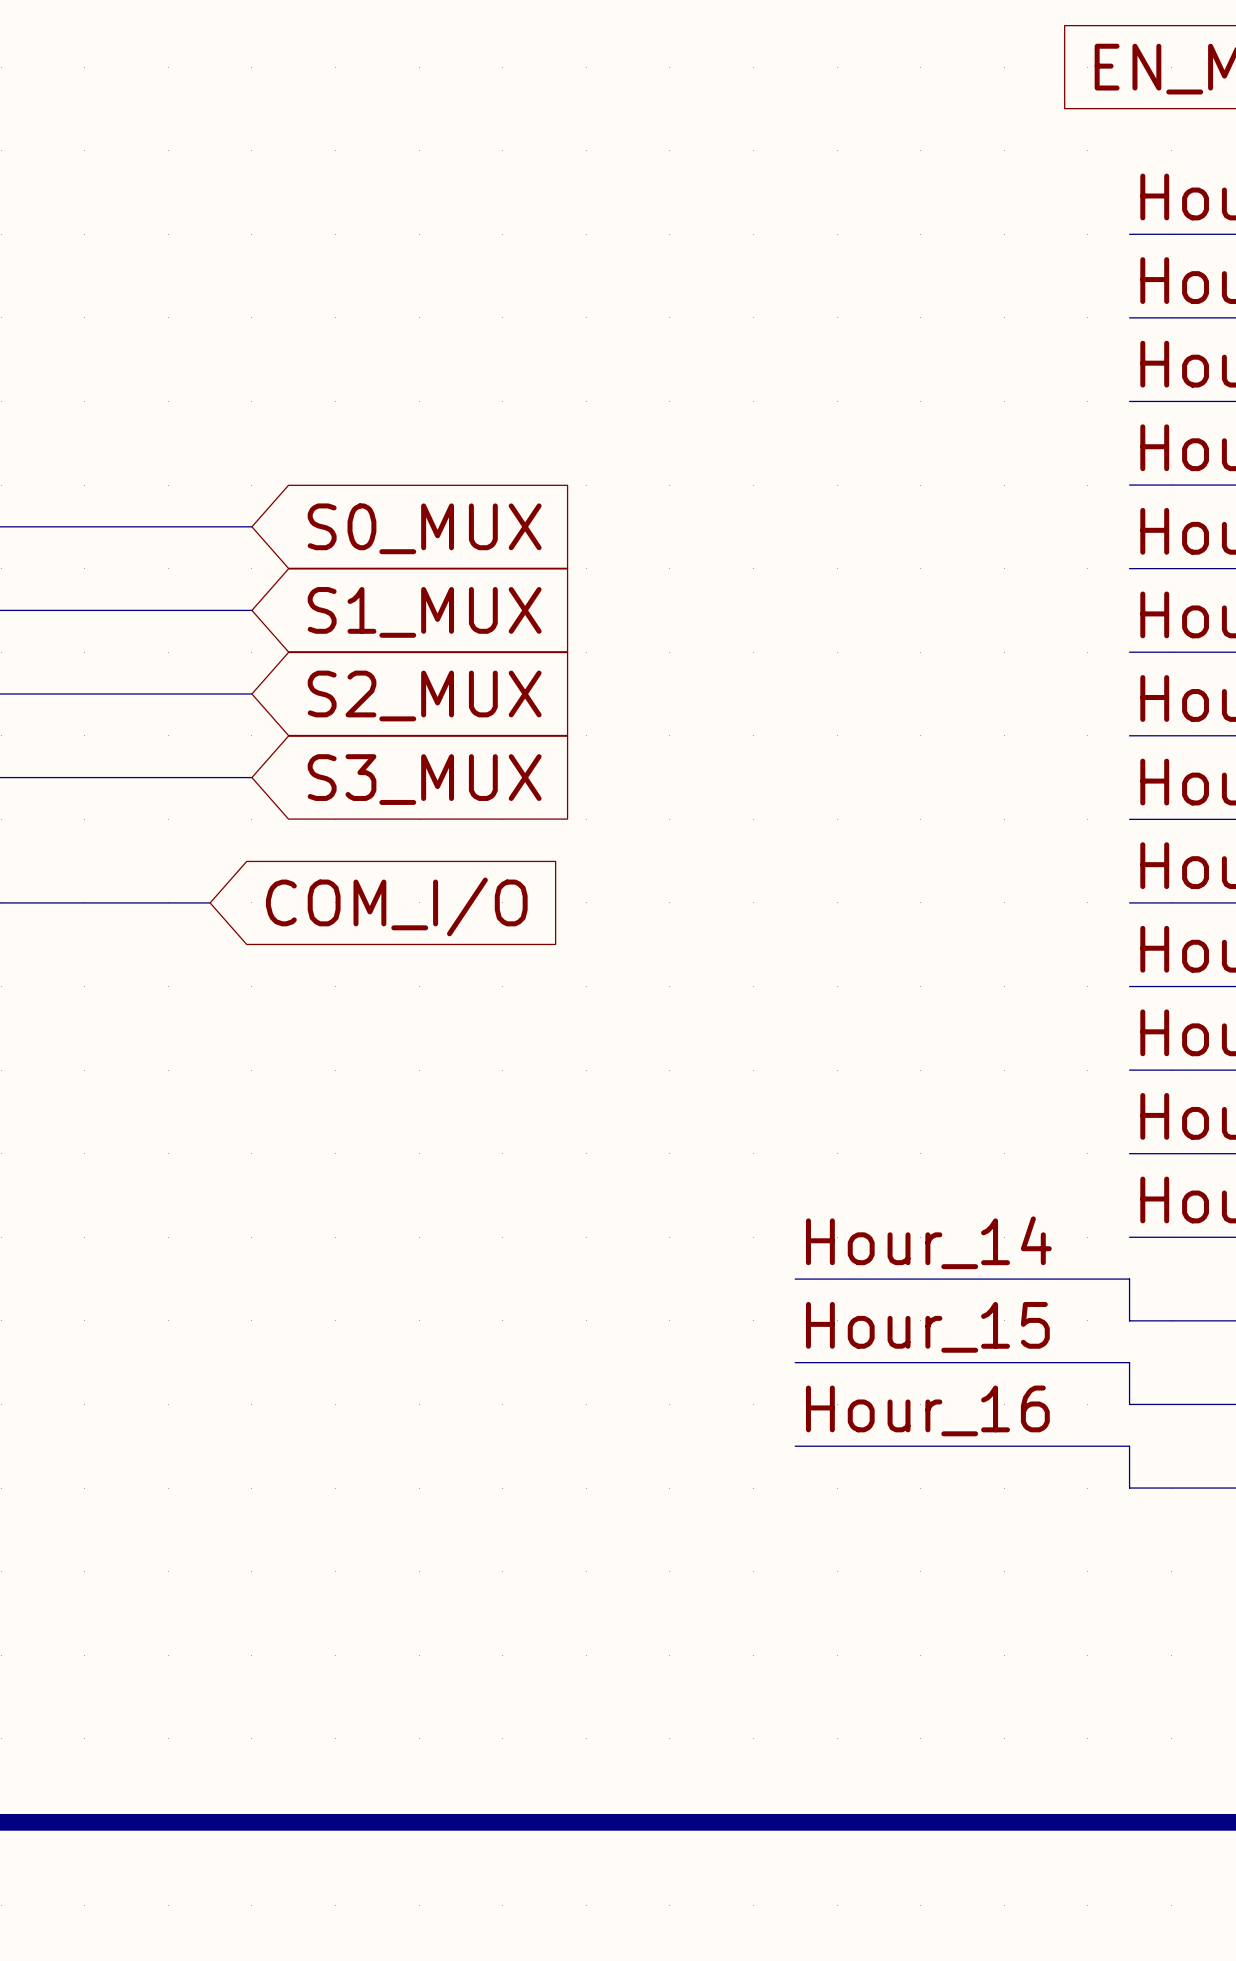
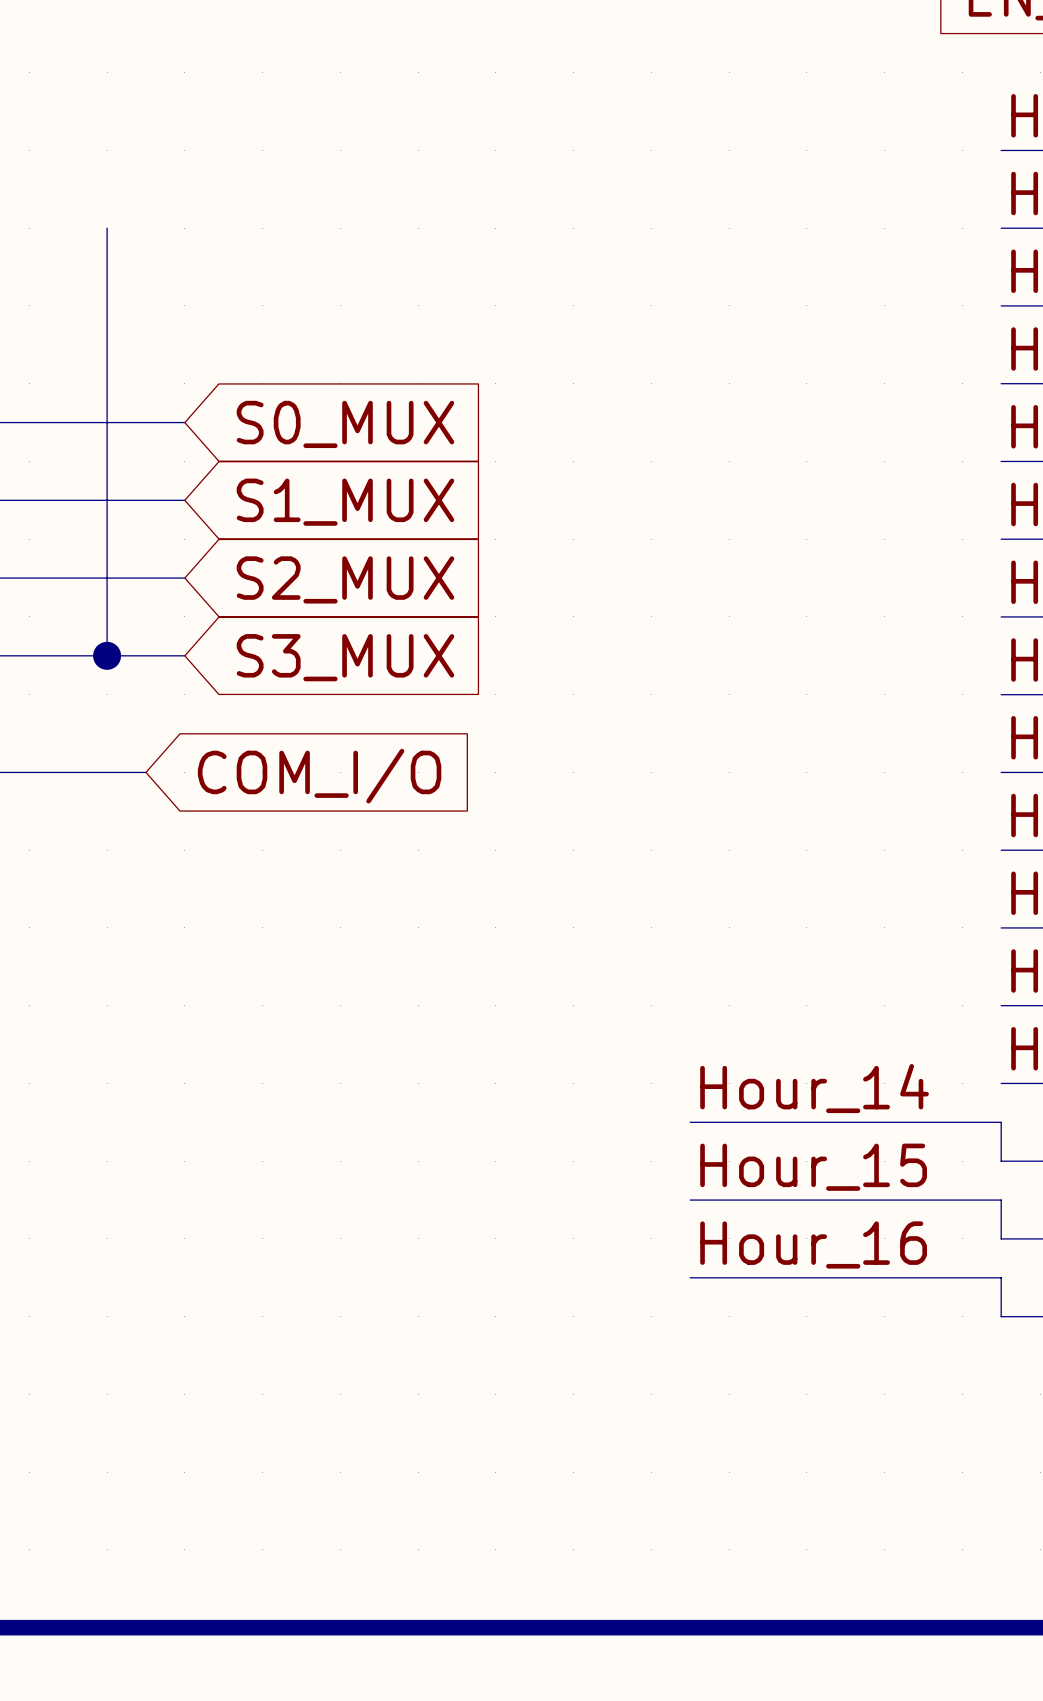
wire: none -> (107, 228) (107, 655)
junction: none -> (107, 655)

